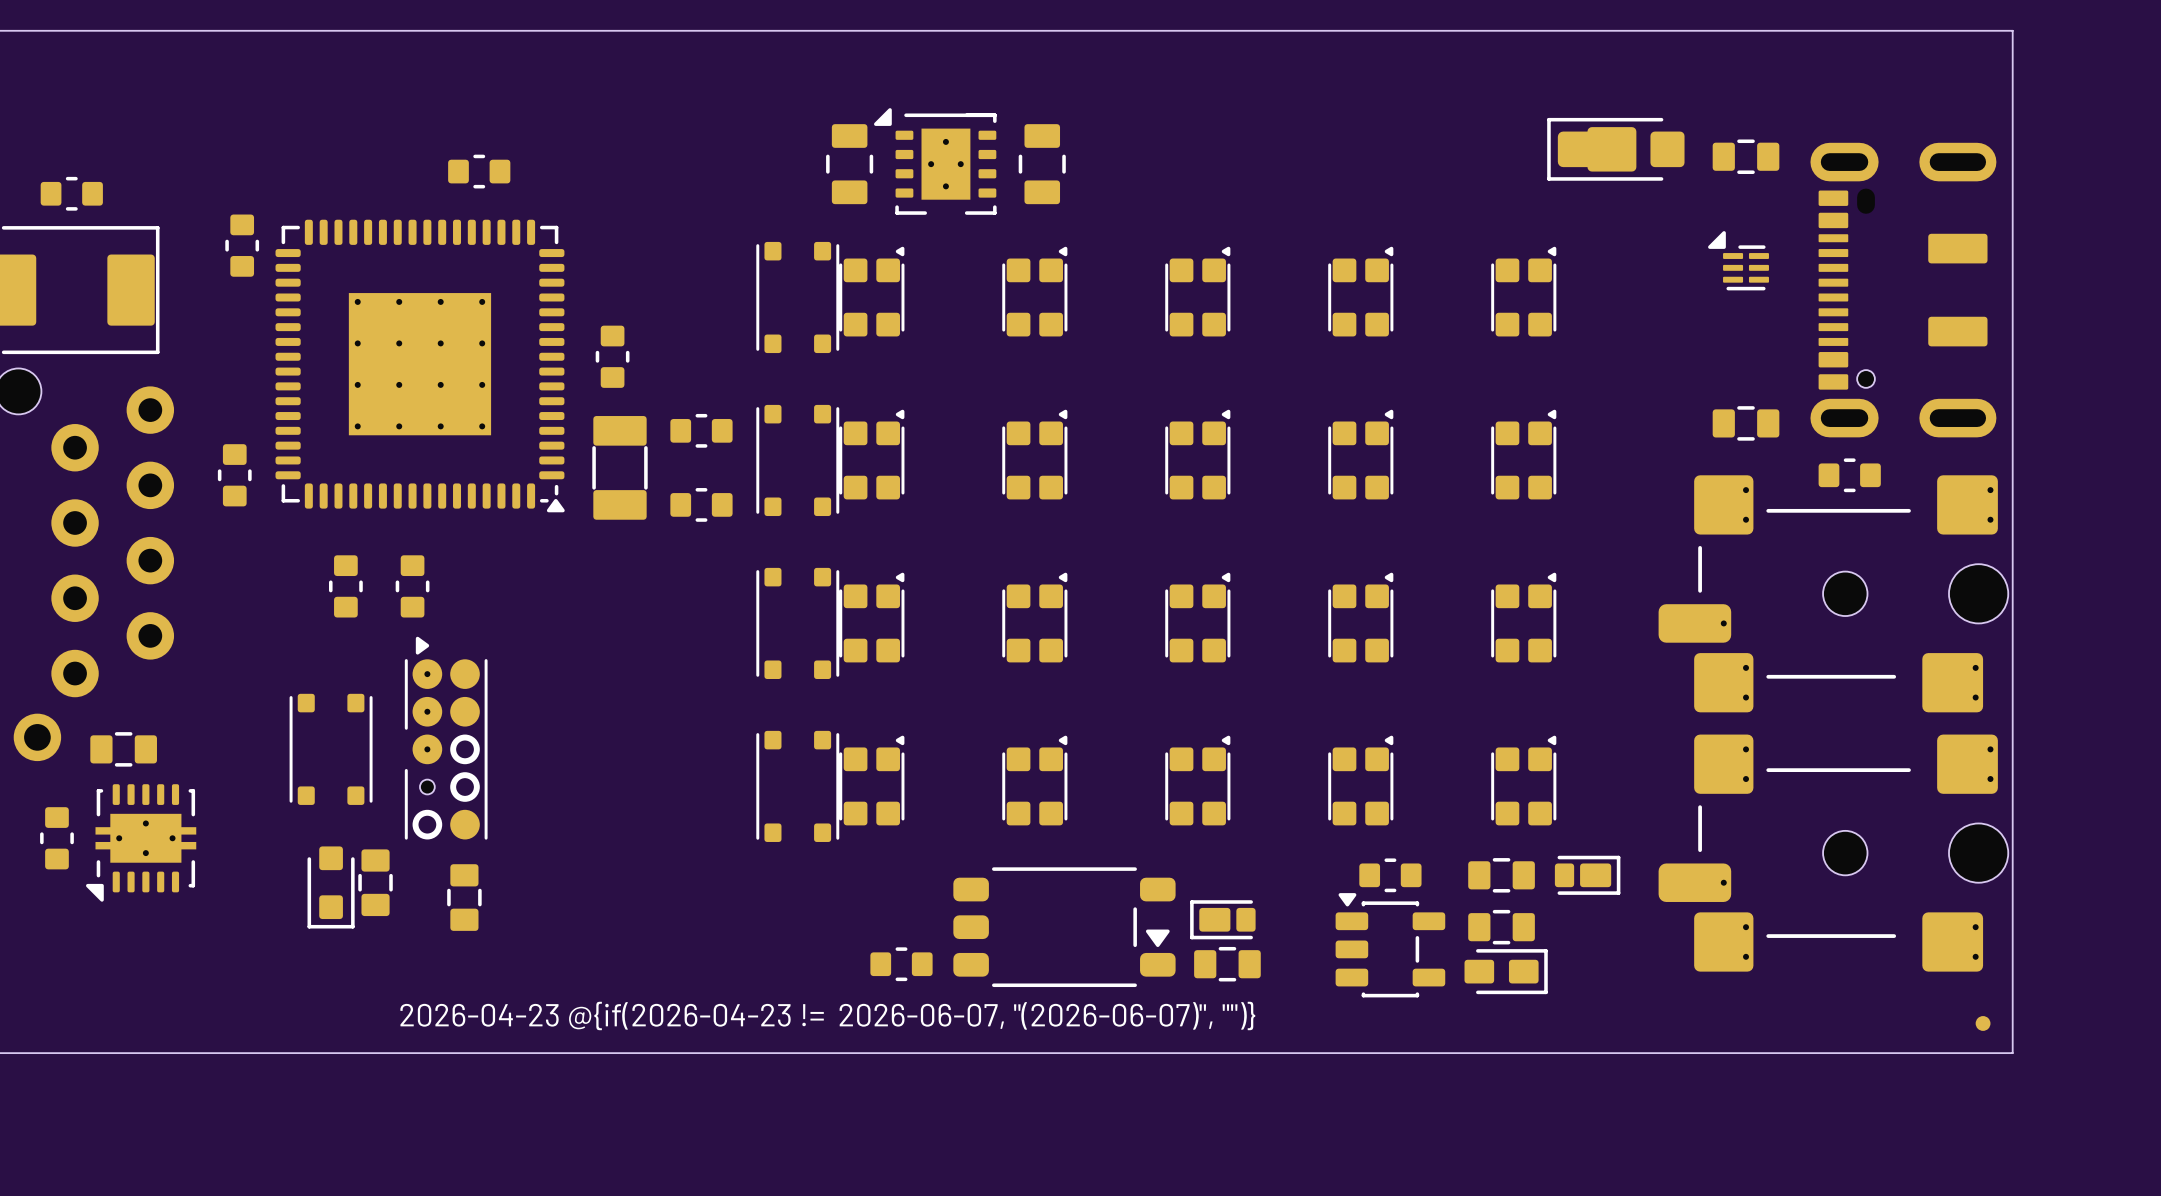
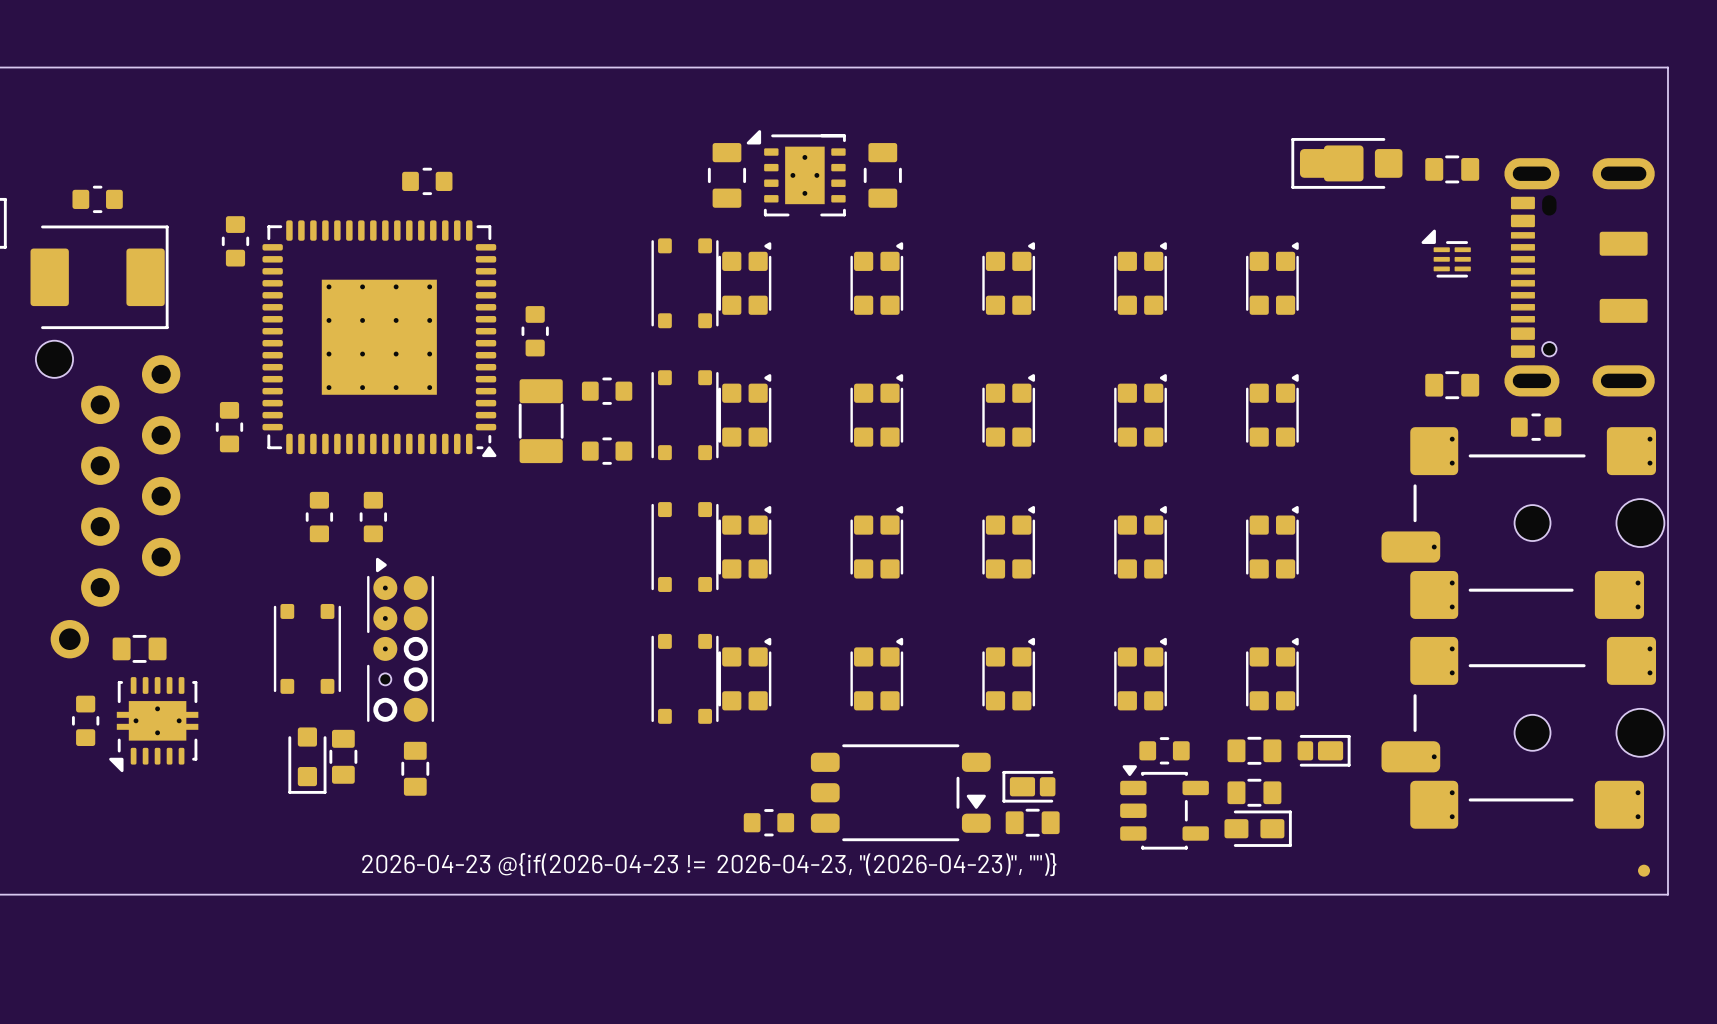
drawing shape: [400, 1001, 1256, 1031] -> [362, 853, 1057, 877]

